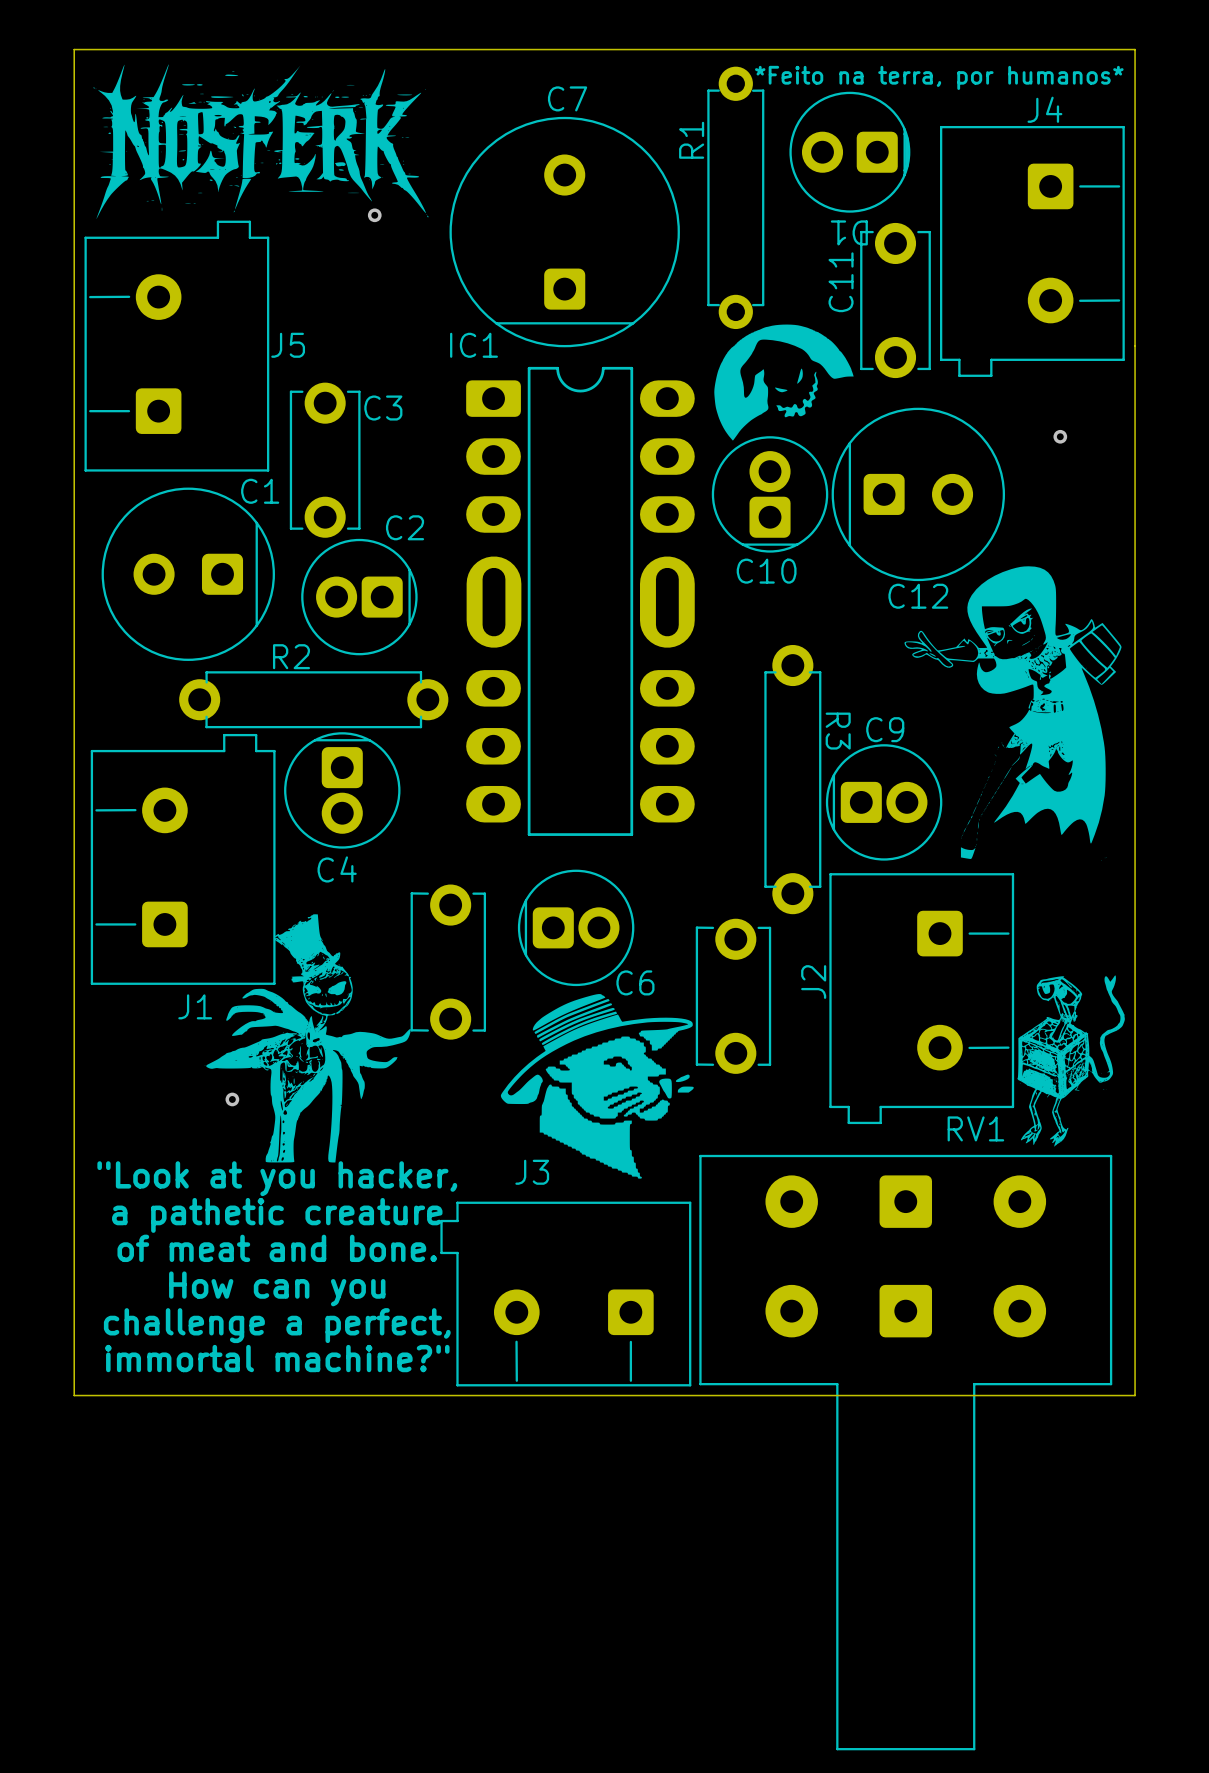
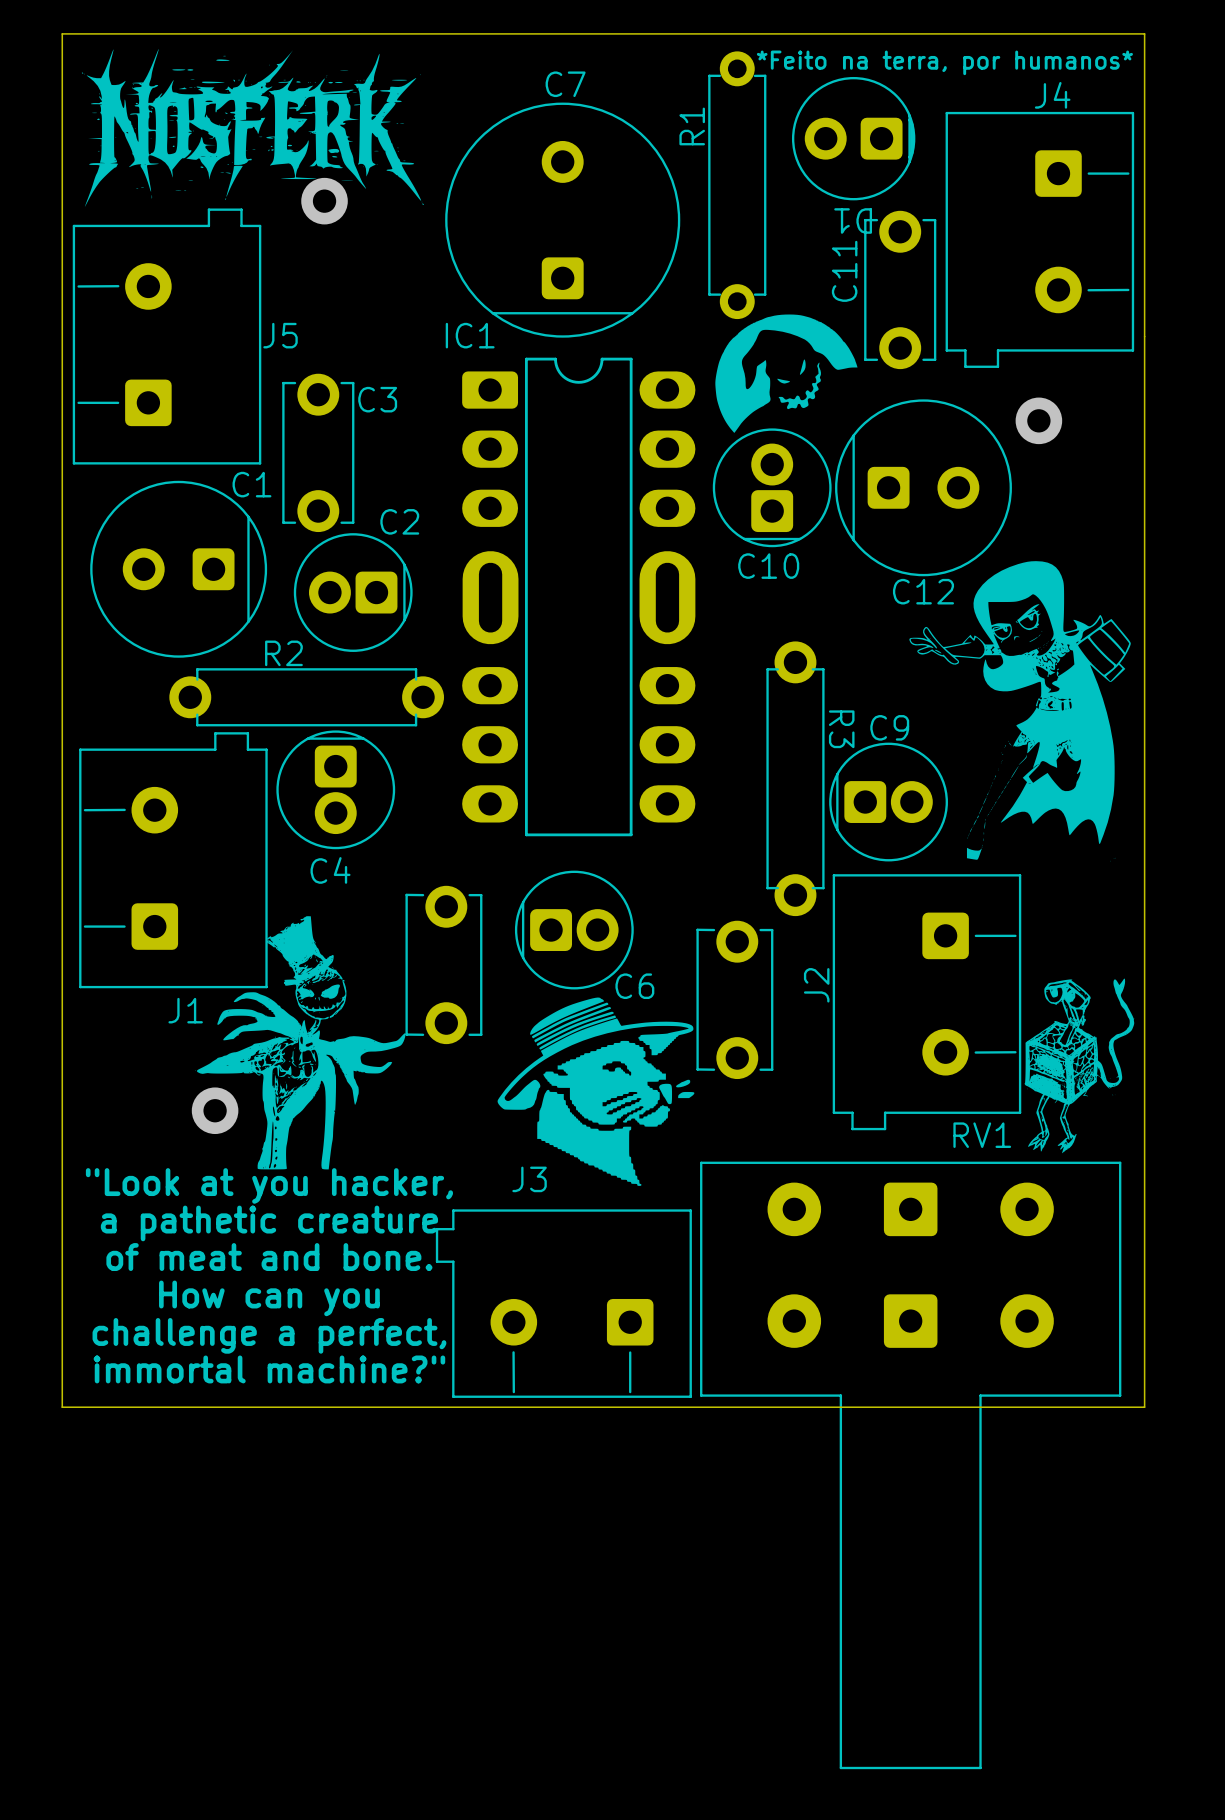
via: none -> (324, 201)
via: (374, 215) -> none
via: none -> (1038, 420)
via: (1060, 436) -> none
via size: [225, 1092, 240, 1107] -> [191, 1087, 239, 1135]

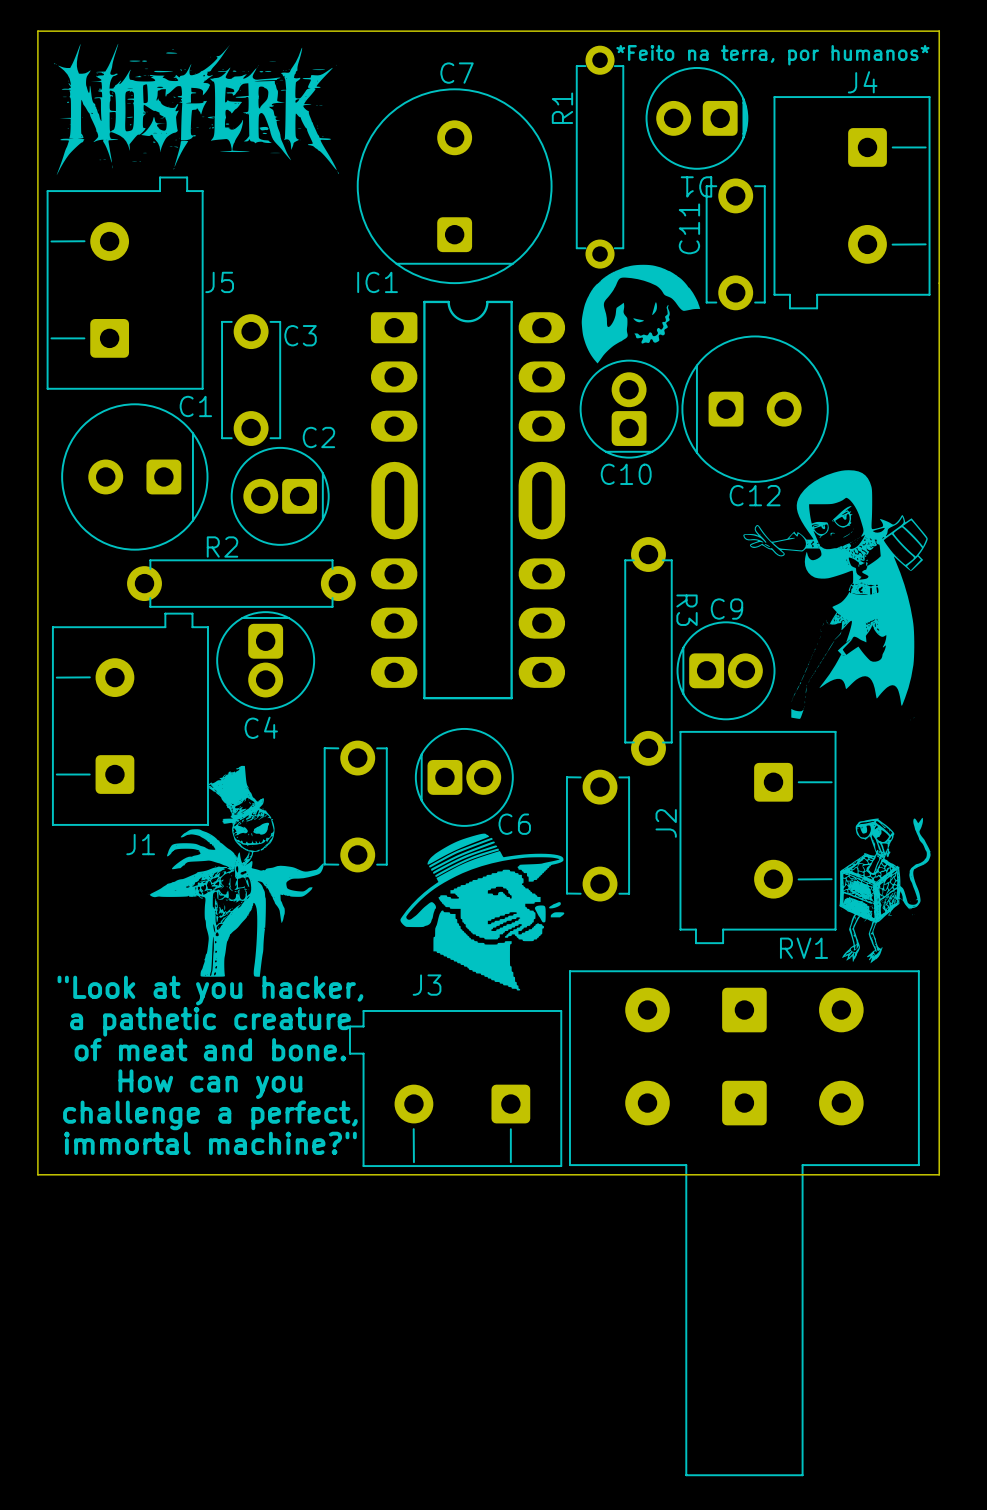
via: (324, 201) -> none
via: (1038, 420) -> none
via: (215, 1110) -> none

